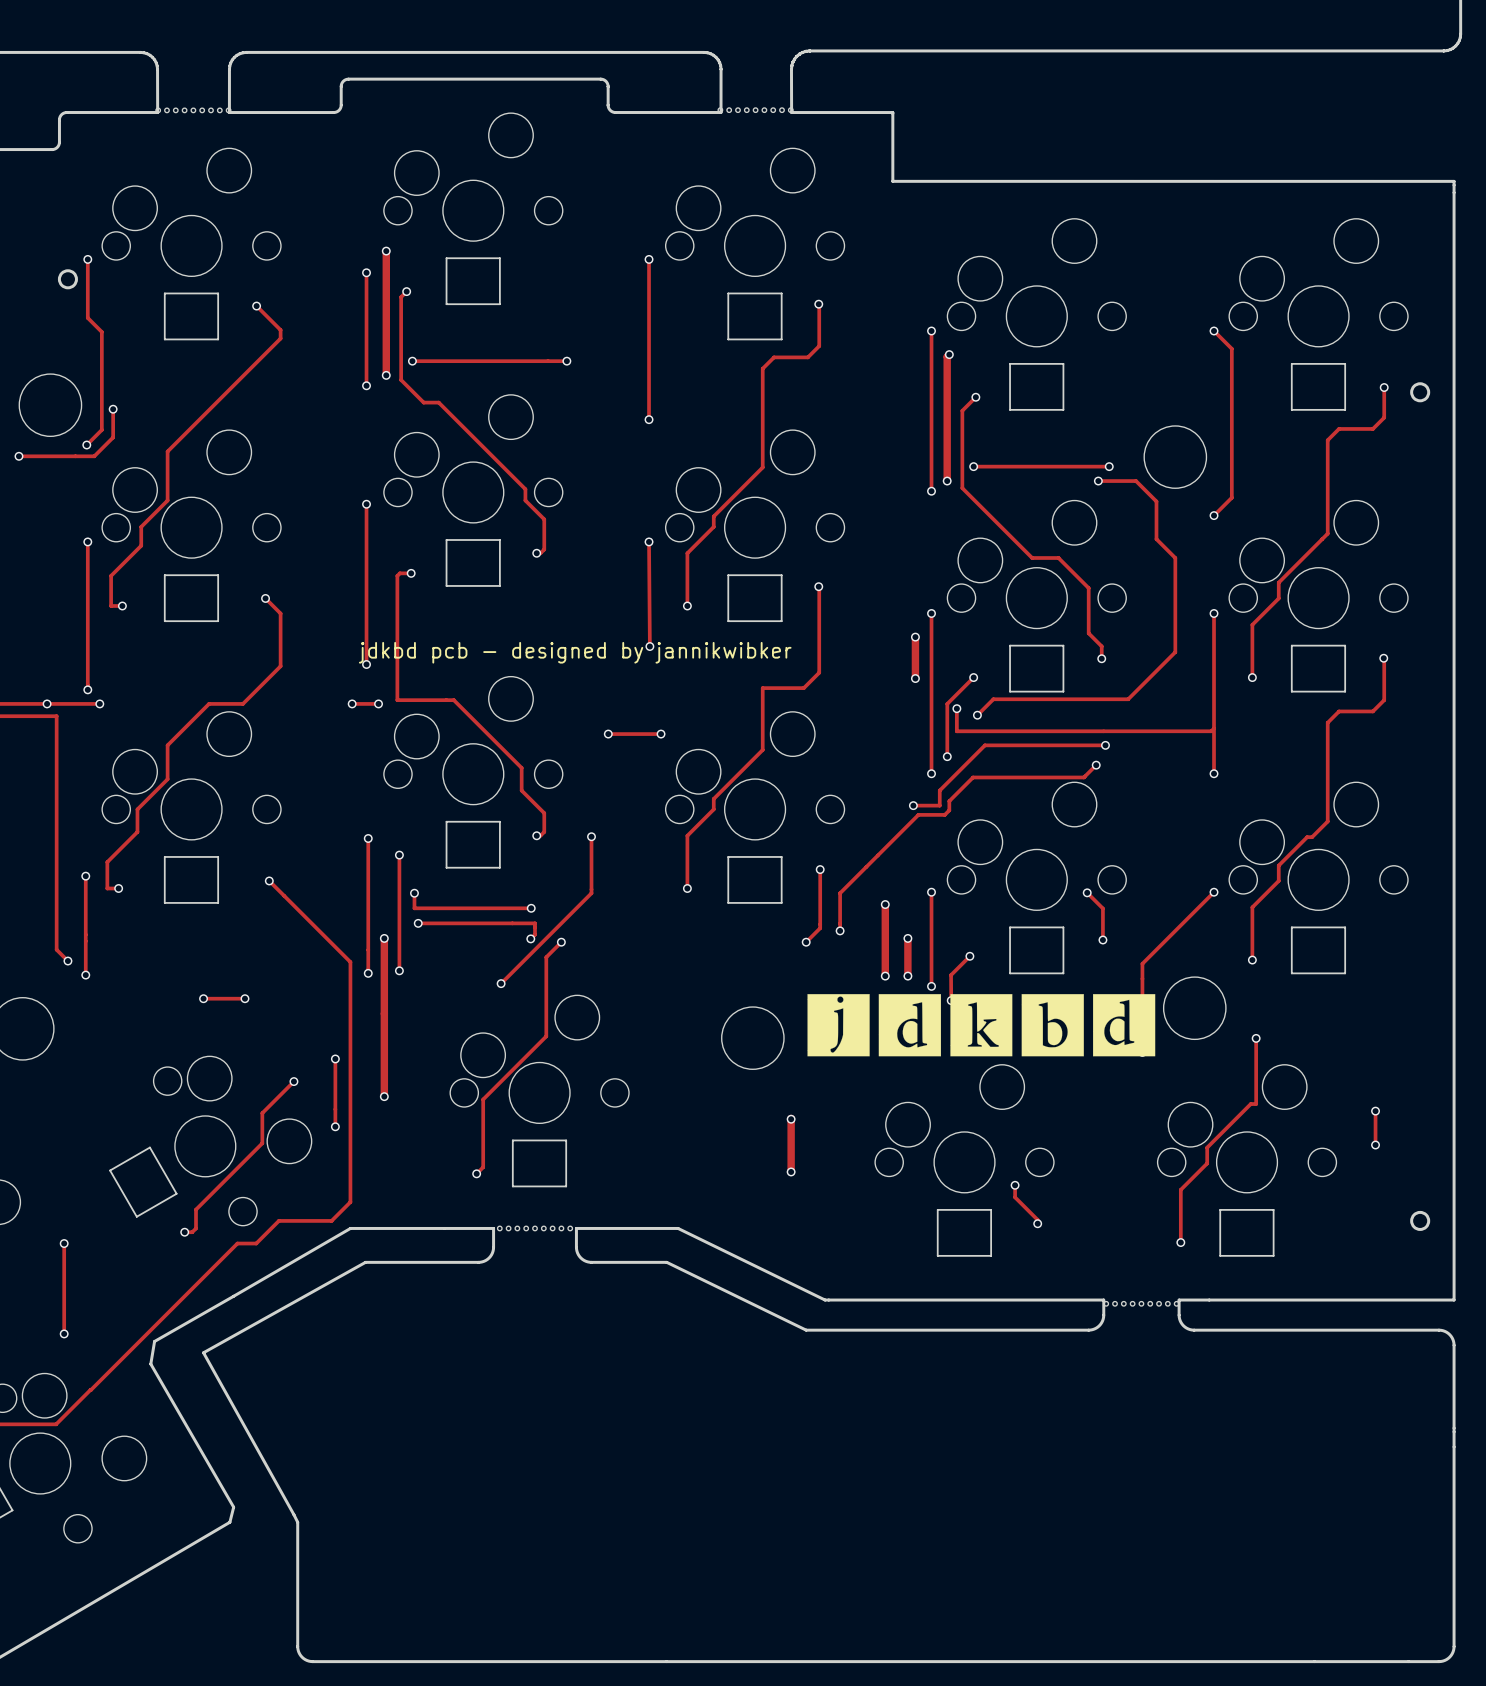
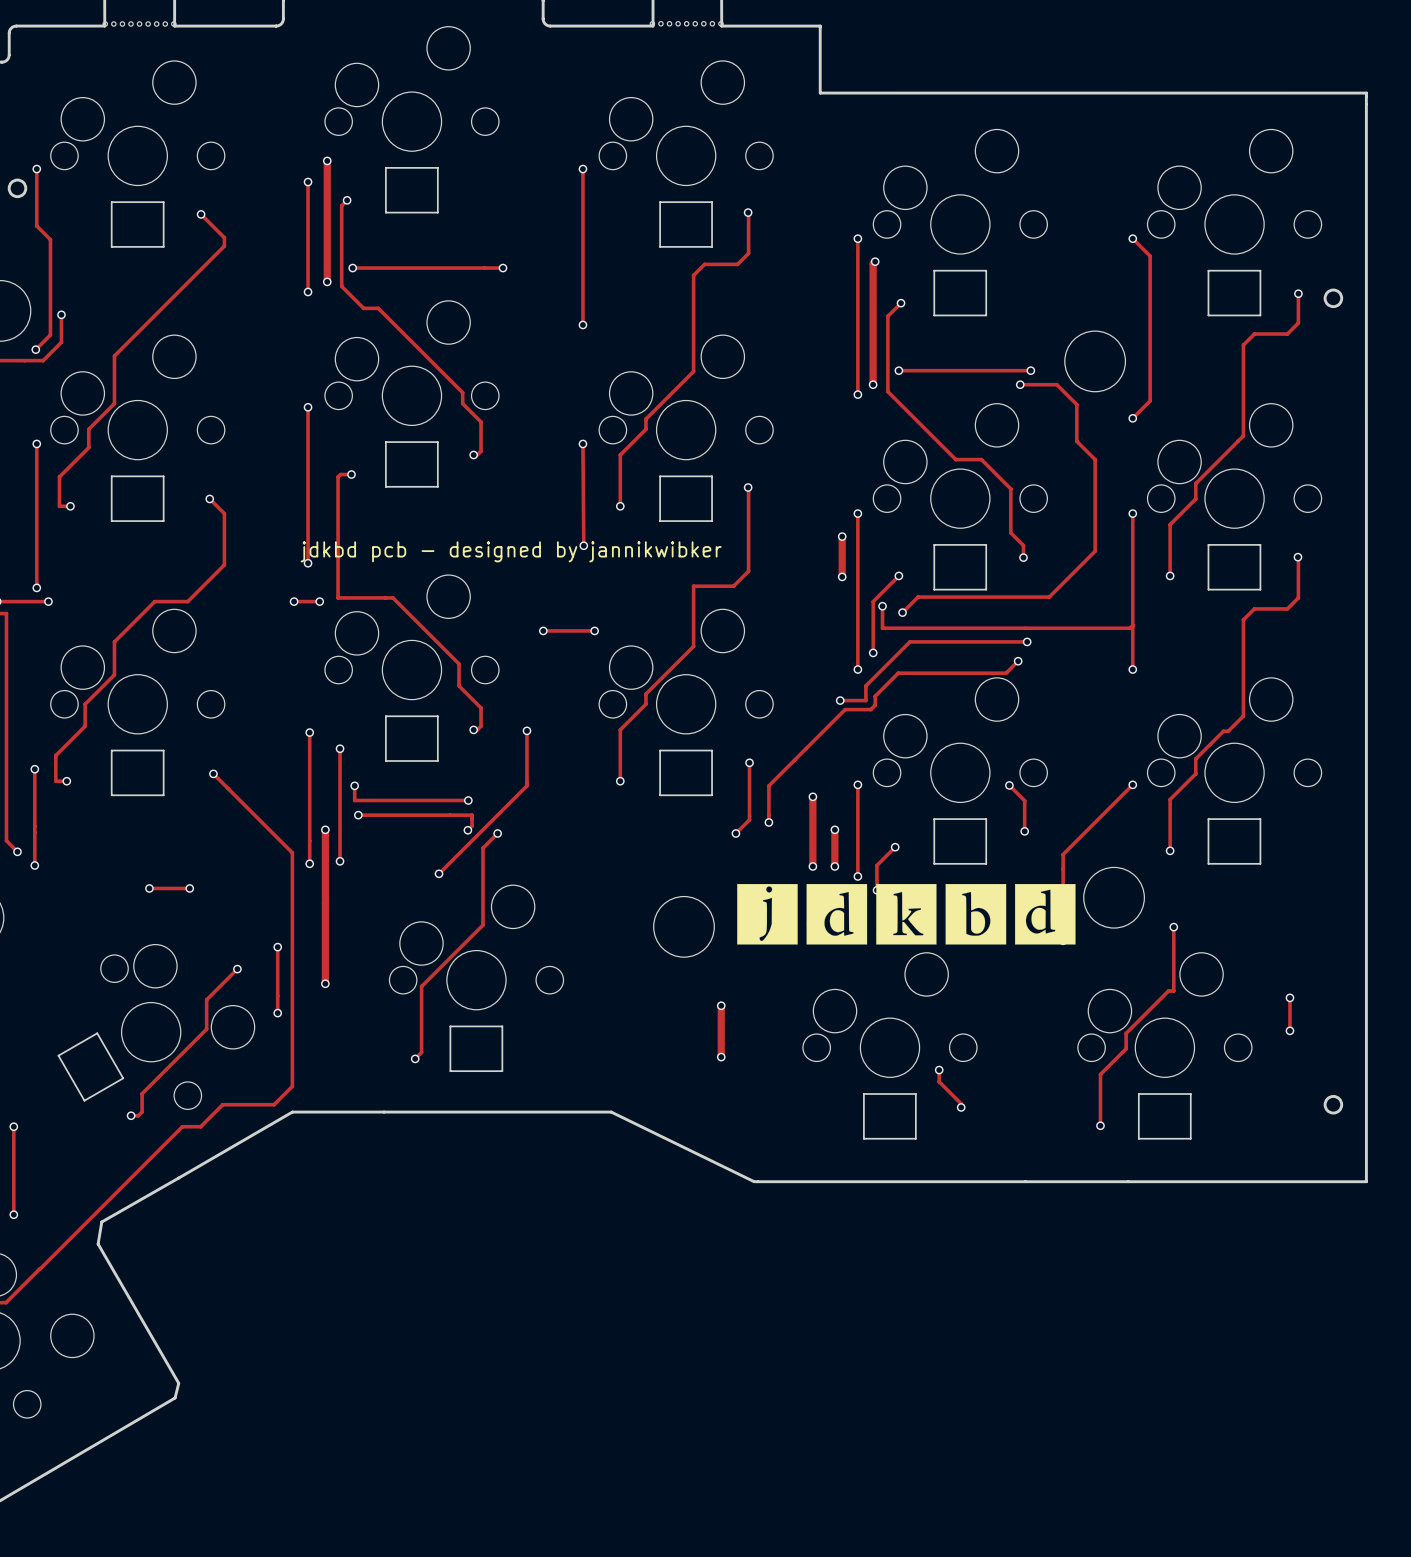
board edge: (493, 1228) (493, 1251) (490, 1256) (484, 1261) (365, 1262) (203, 1352) (297, 1522) (297, 1648) (300, 1655) (307, 1660) (1438, 1661) (1448, 1658) (1452, 1652) (1454, 1646) (1454, 1345) (1450, 1336) (1444, 1331) (1438, 1330) (1192, 1330) (1184, 1327) (1180, 1320) (1179, 1300) -> (431, 1112) (512, 1112)
part: (535, 1228) -> none
board edge: (576, 1228) (576, 1251) (579, 1256) (585, 1261) (666, 1262) (806, 1330) (1090, 1330) (1097, 1327) (1102, 1320) (1103, 1300) -> (1098, 1181) (1025, 1181)
part: (1141, 1303) -> none

